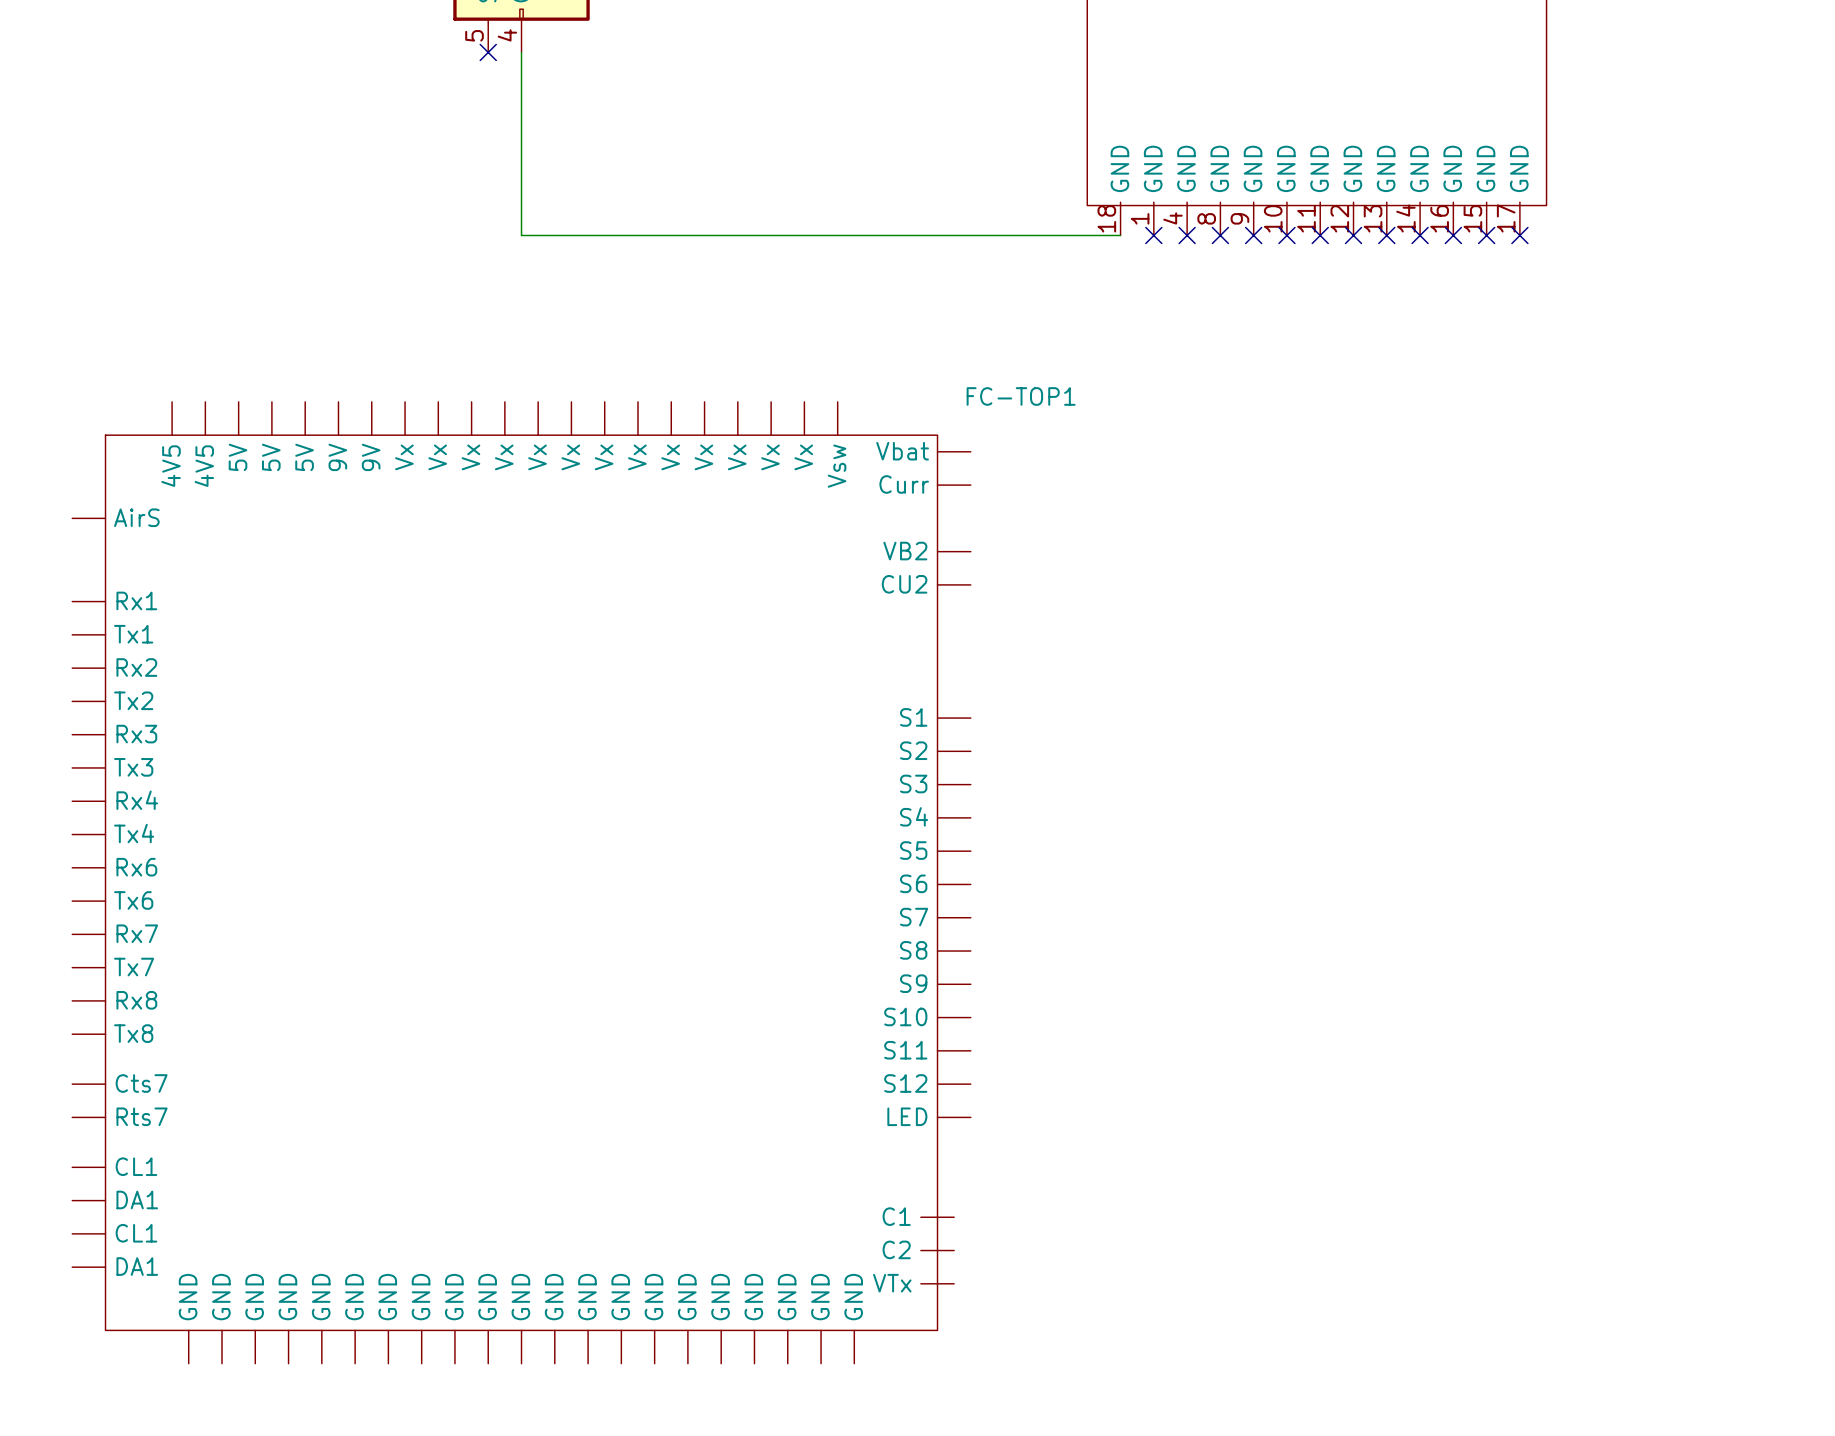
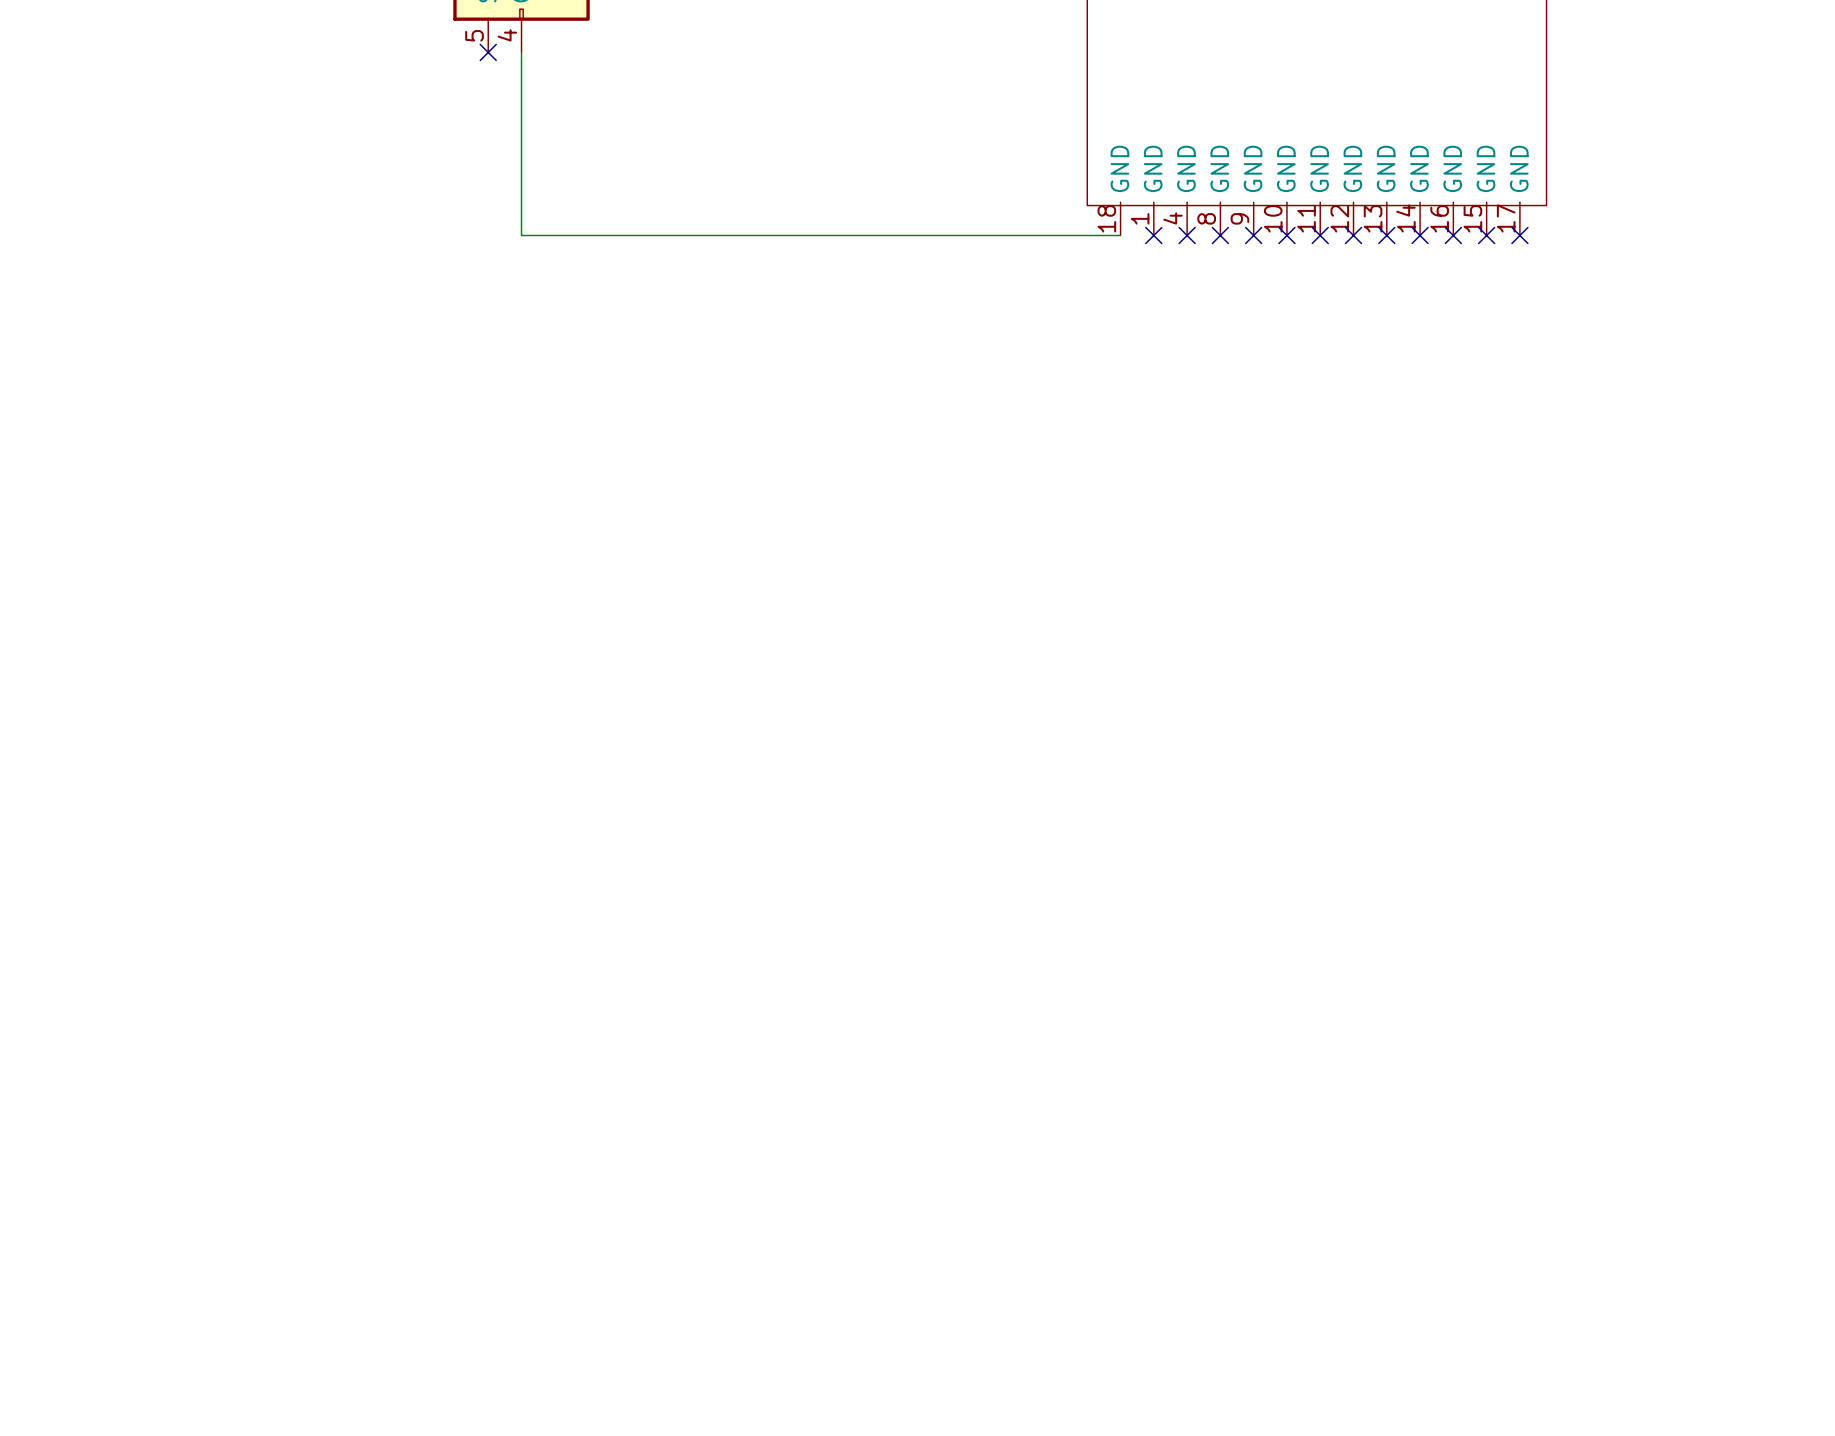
FC-TOP1: (521, 882) -> none

